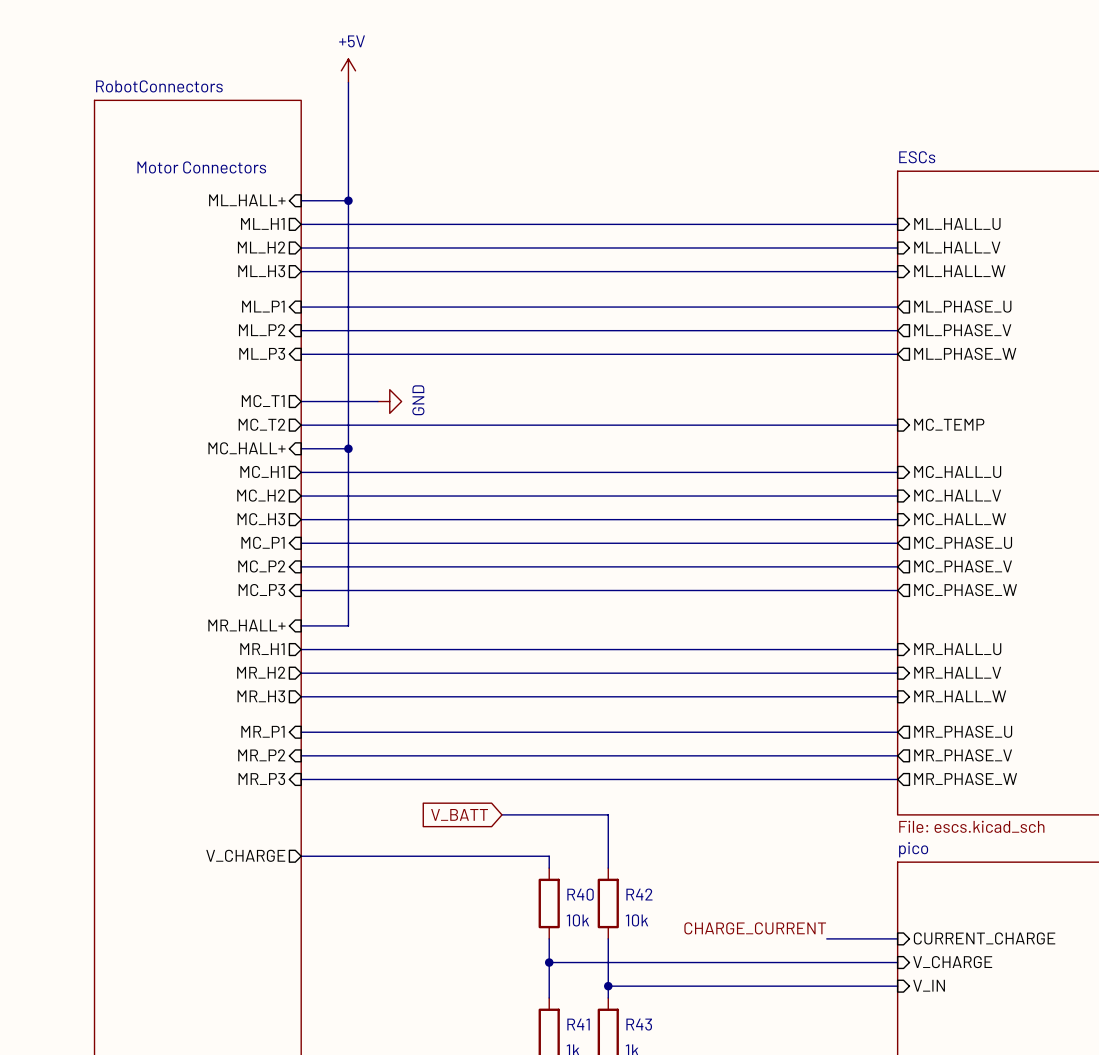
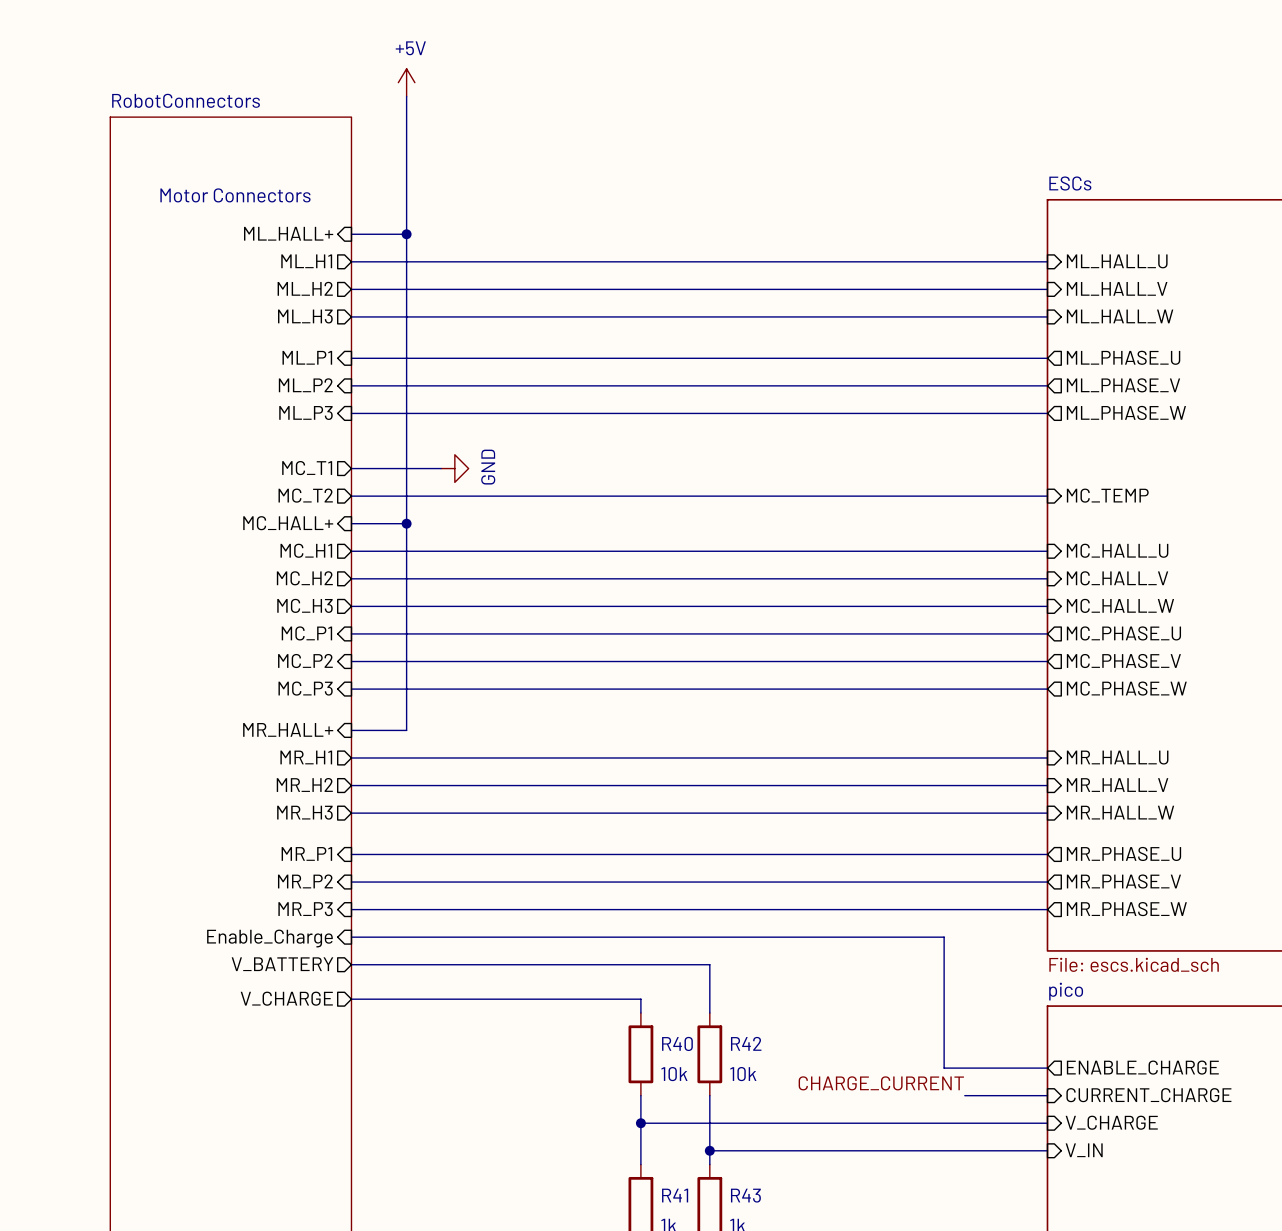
wire: none -> (351, 937) (944, 937) (944, 1068) (1047, 1068)
sheet pin: none -> Enable_Charge (269, 938)
global label: V_BATT (459, 814) -> none
wire: (501, 814) (608, 814) (608, 826) -> (351, 964) (709, 964)
sheet pin: none -> V_BATTERY (282, 964)
sheet pin: none -> ENABLE_CHARGE (1142, 1067)

